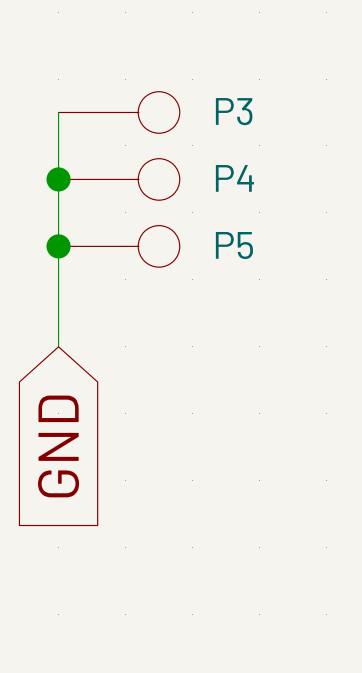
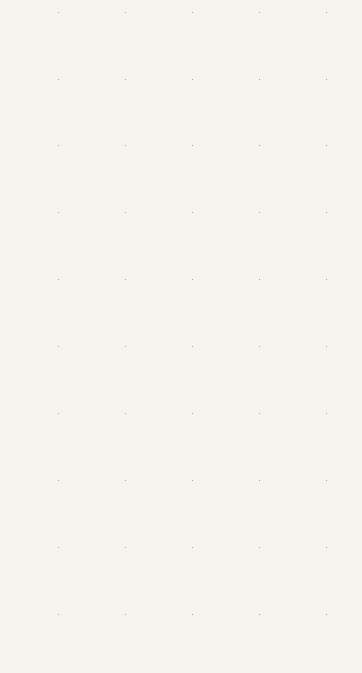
wire: (58, 112) (58, 346) -> none
P3: (119, 112) -> none
junction: (58, 179) -> none
P4: (119, 179) -> none
junction: (58, 246) -> none
P5: (119, 246) -> none
global label: GND (58, 446) -> none

